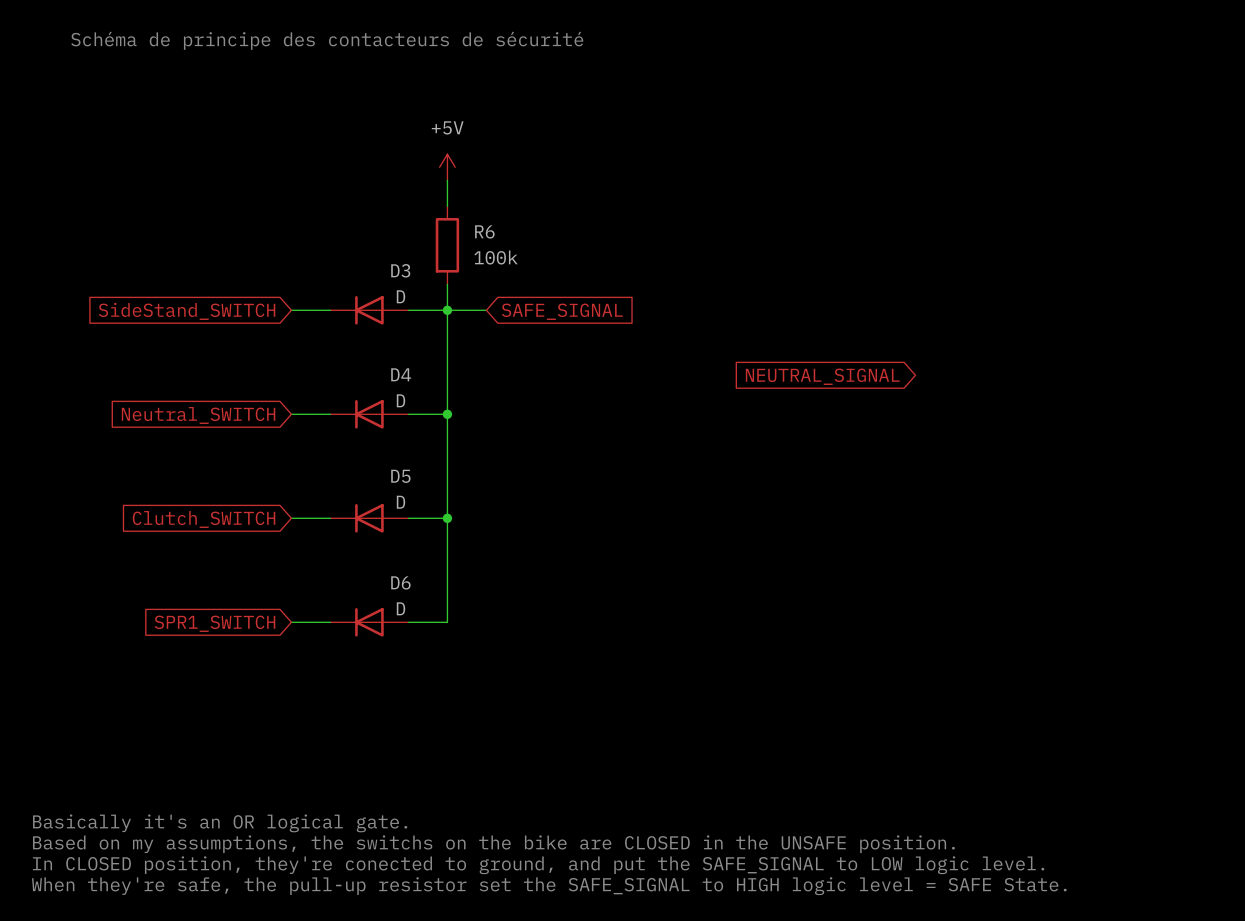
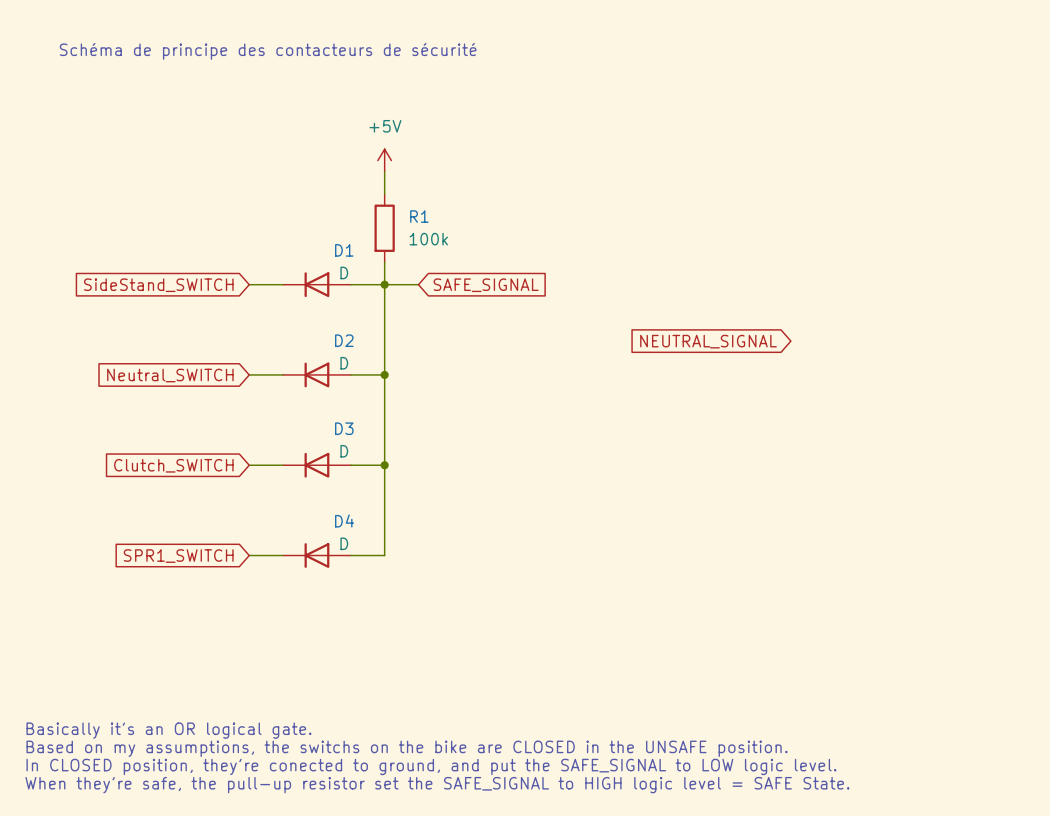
R6 name: R6 (484, 231) -> R1 (419, 216)
D3 name: D3 (400, 270) -> D1 (344, 250)
D4 name: D4 (401, 374) -> D2 (344, 340)
D5 name: D5 (400, 476) -> D3 (344, 428)
D6 name: D6 (400, 582) -> D4 (344, 520)

